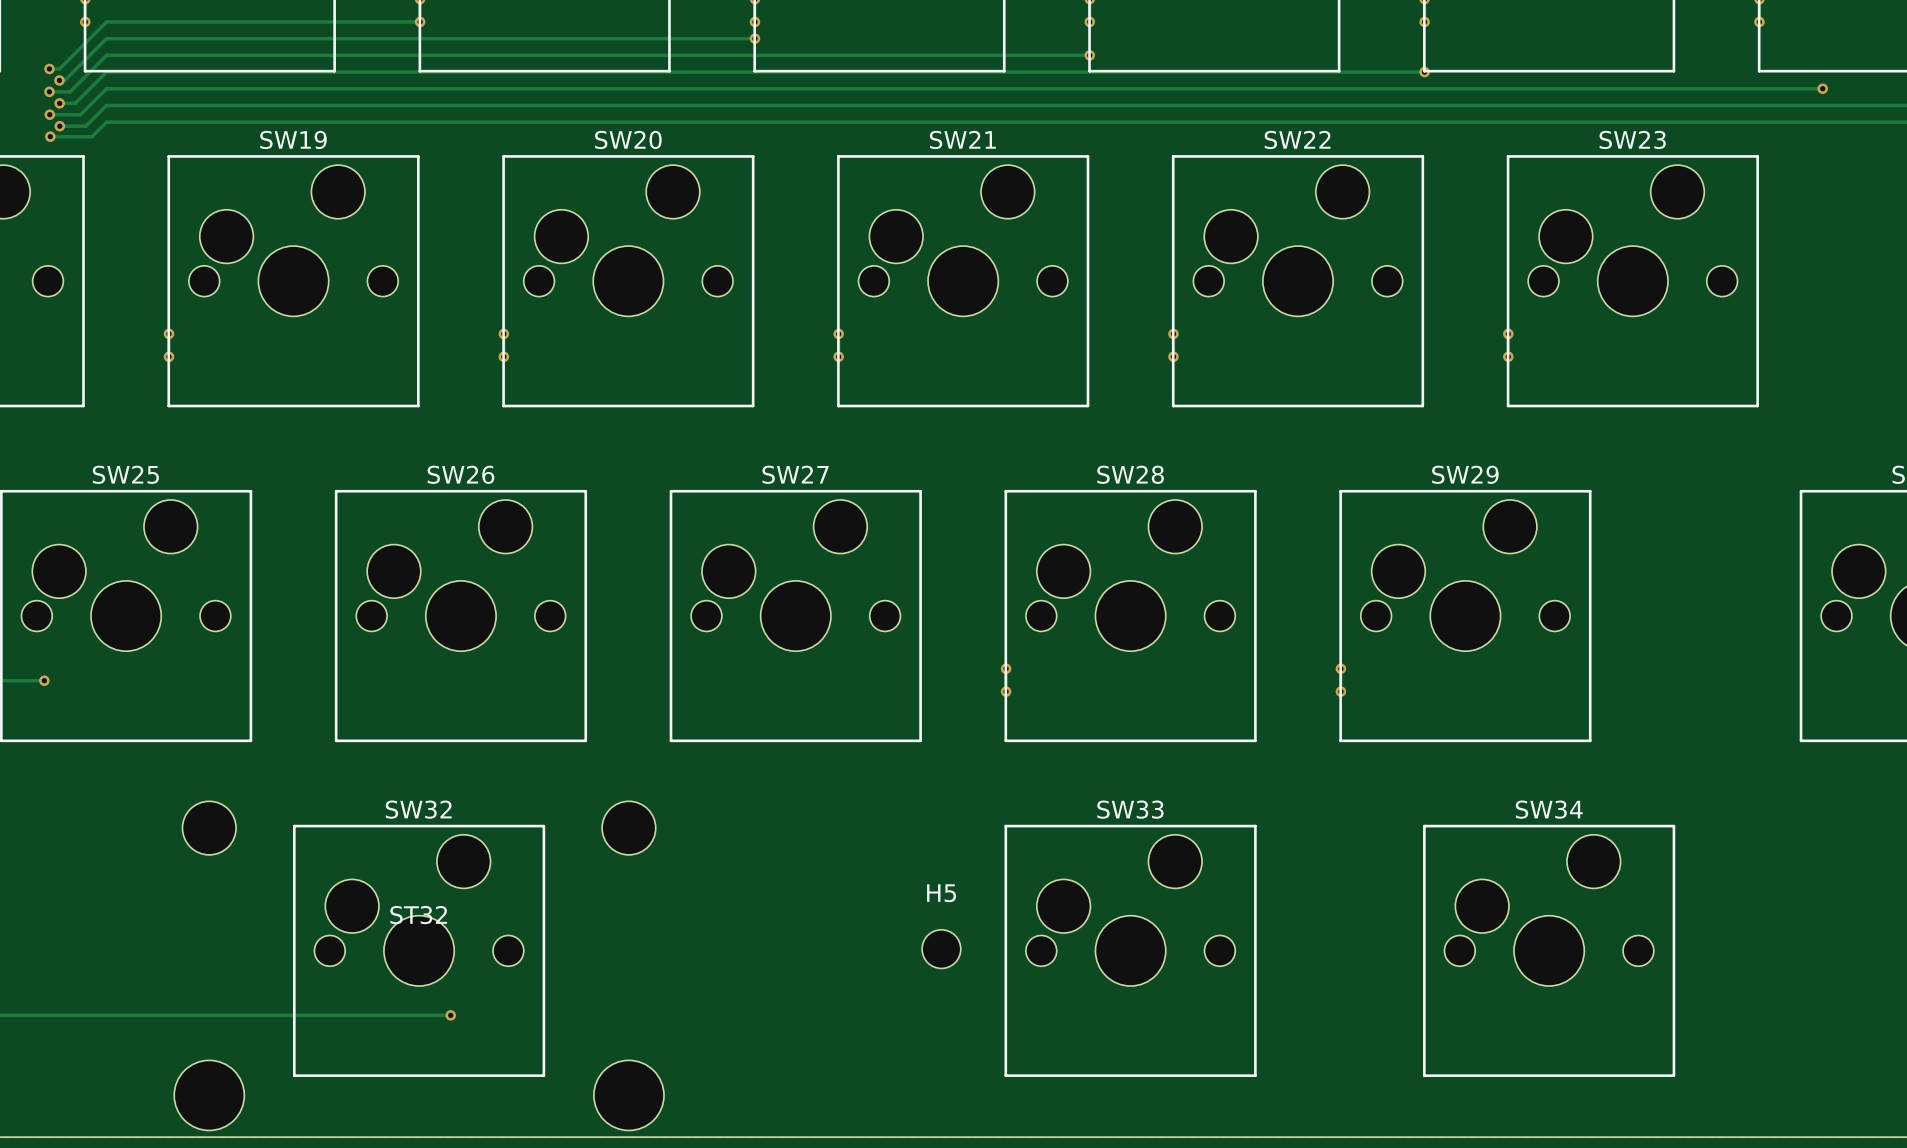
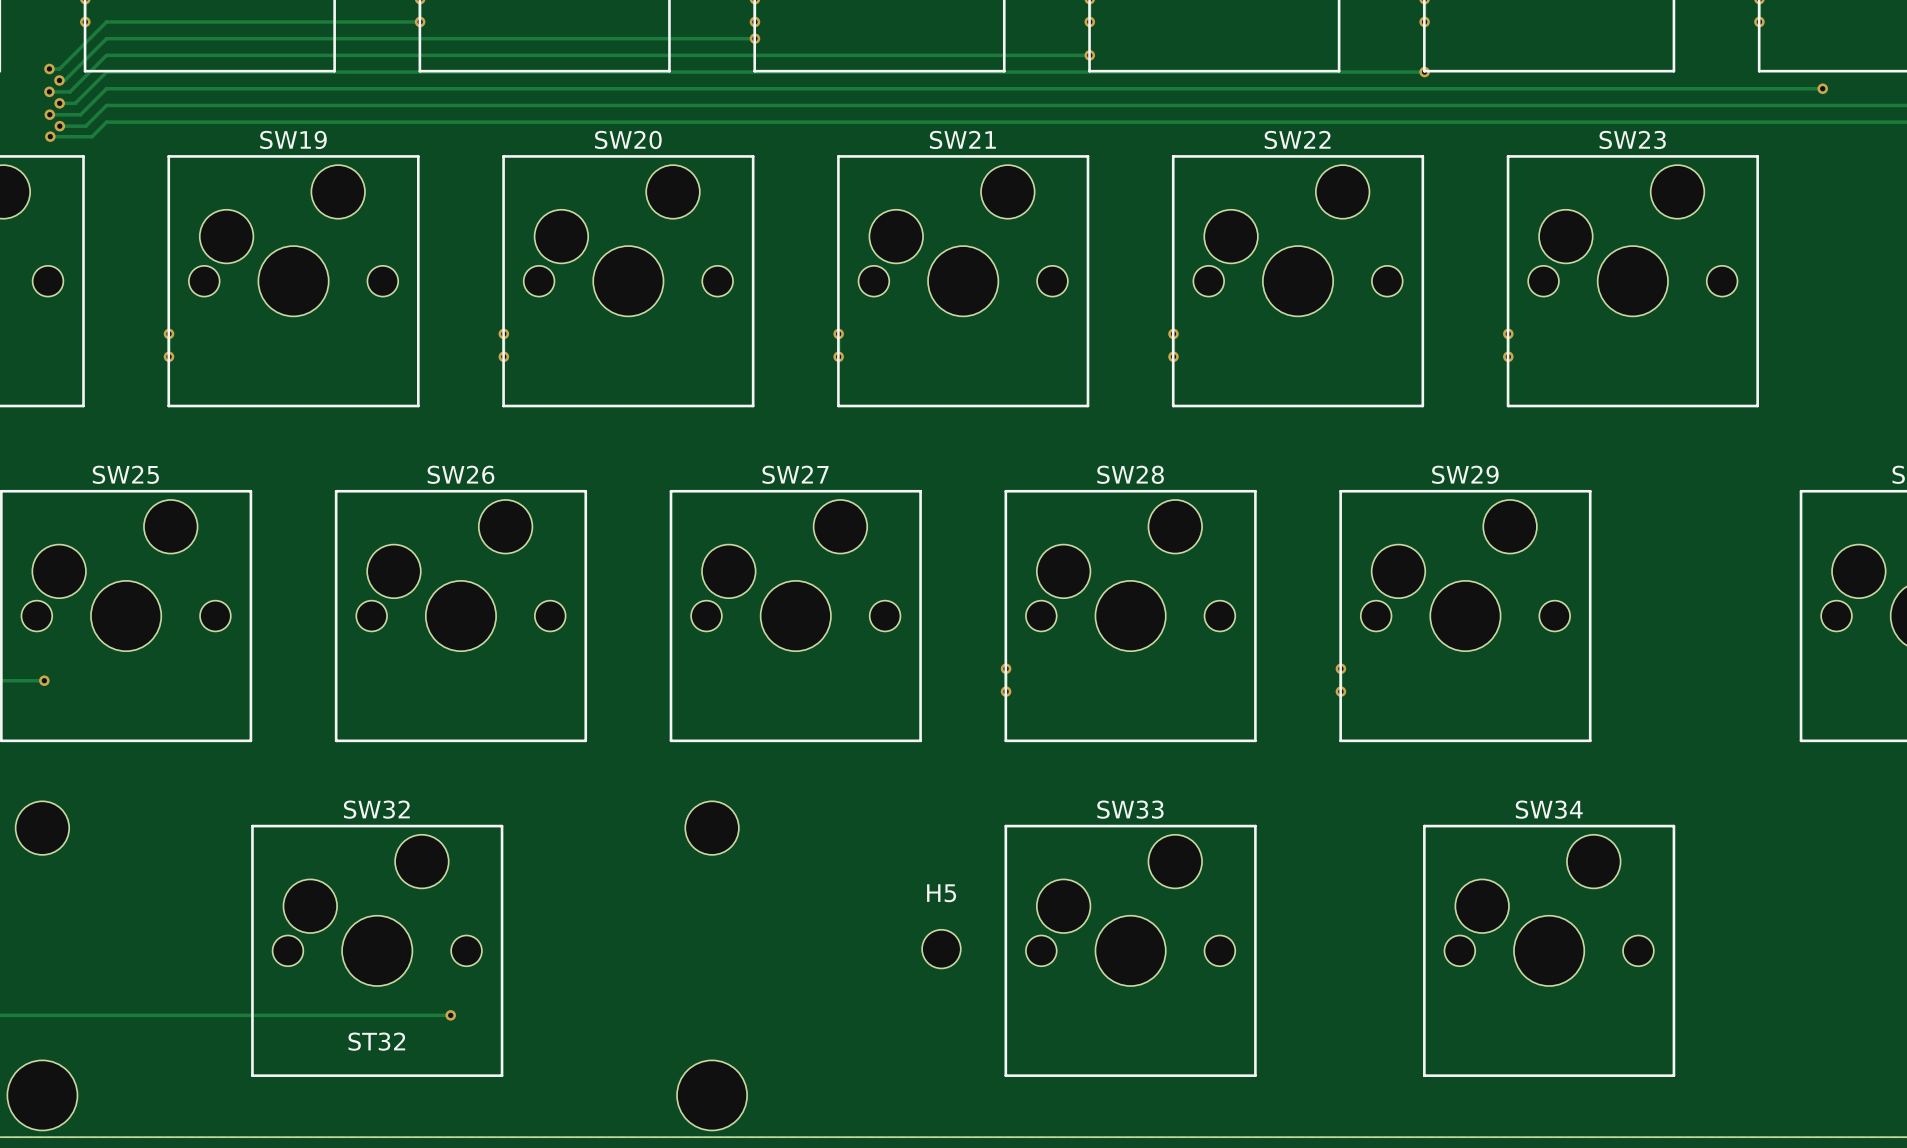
ST32 footprint: [174, 801, 664, 1131] -> [7, 801, 748, 1131]
ST32 name position: ST32 (418, 915) -> ST32 (376, 1041)
SW32 position: (419, 950) -> (377, 950)

